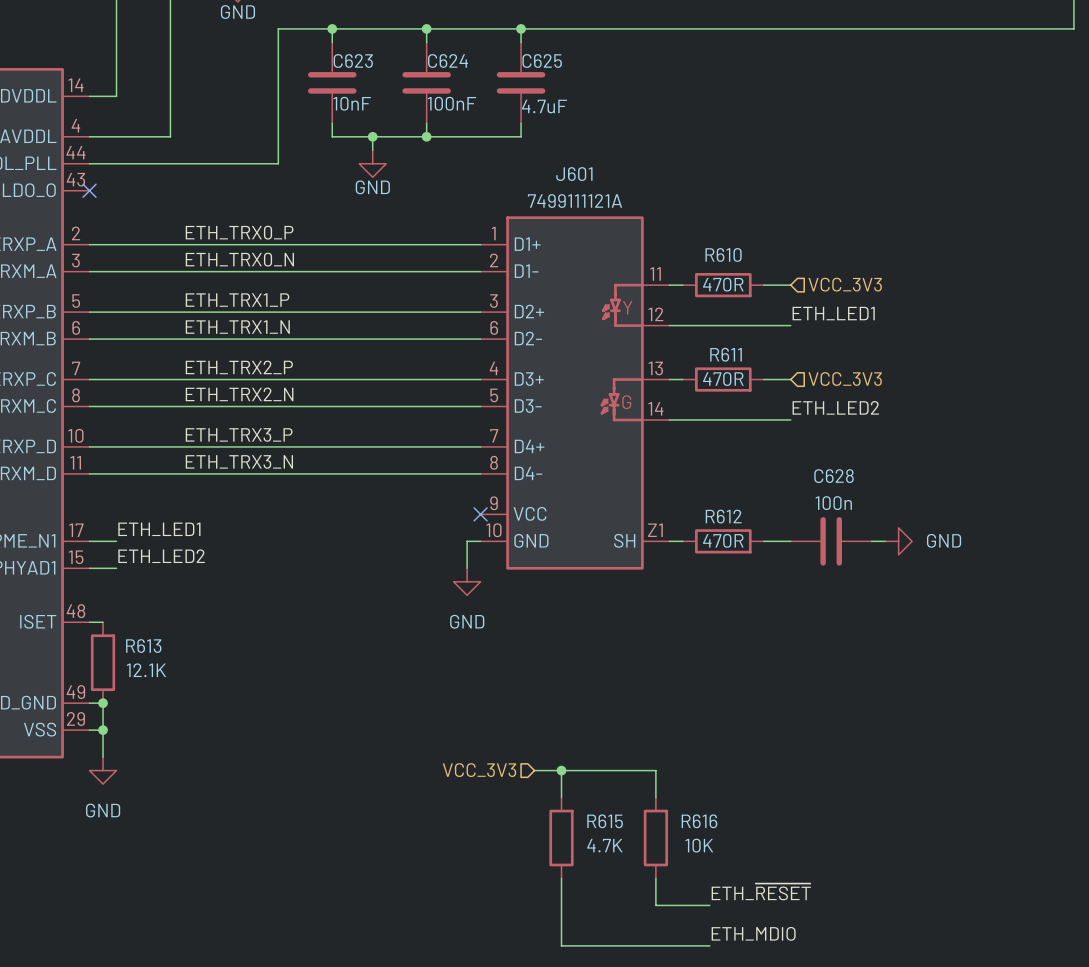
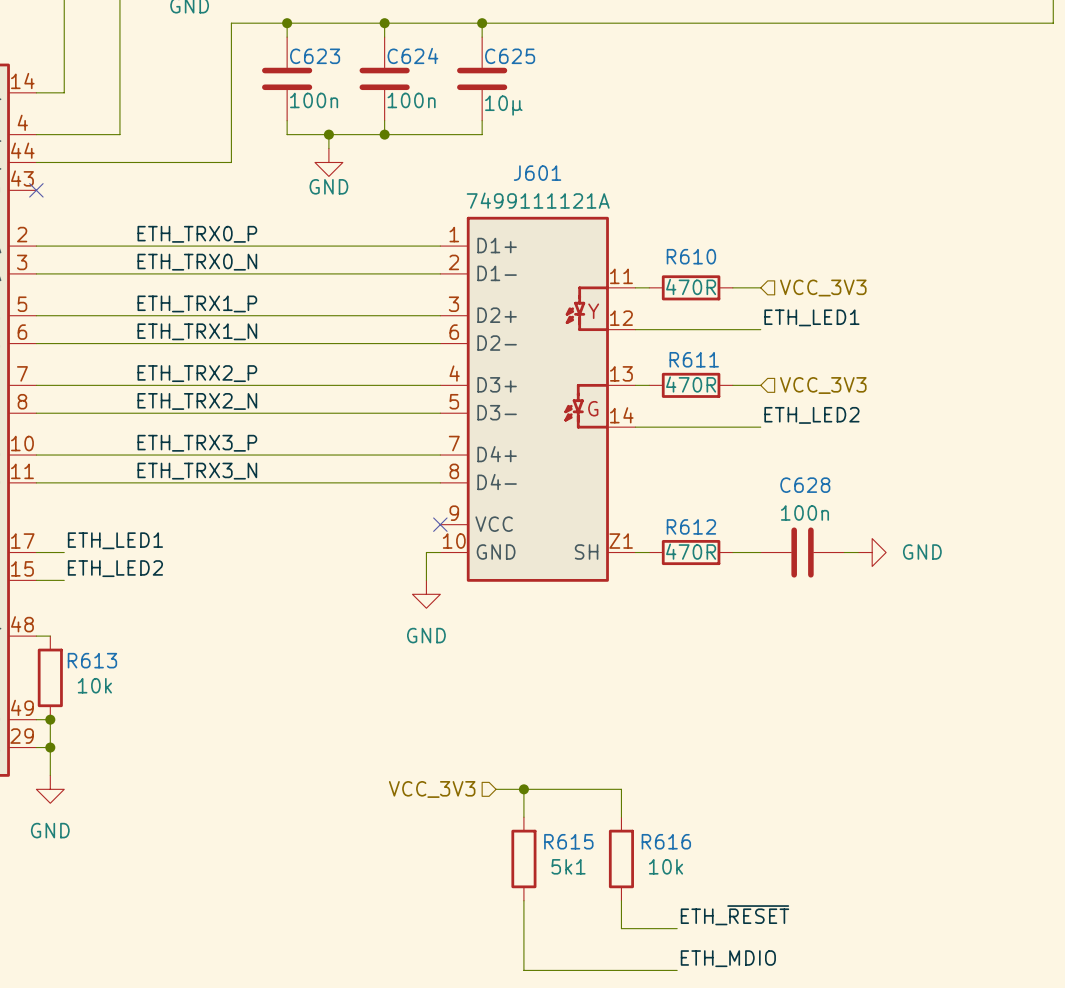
C623 value: 10nF (352, 103) -> 100n (314, 100)
C624 value: 100nF (451, 103) -> 100n (411, 100)
C625 value: 4.7uF (544, 106) -> 10µ (503, 105)
R613 value: 12.1K (146, 670) -> 10k (94, 685)
R615 value: 4.7K (604, 845) -> 5k1 (568, 866)
R616 value: 10K (699, 845) -> 10k (666, 866)

